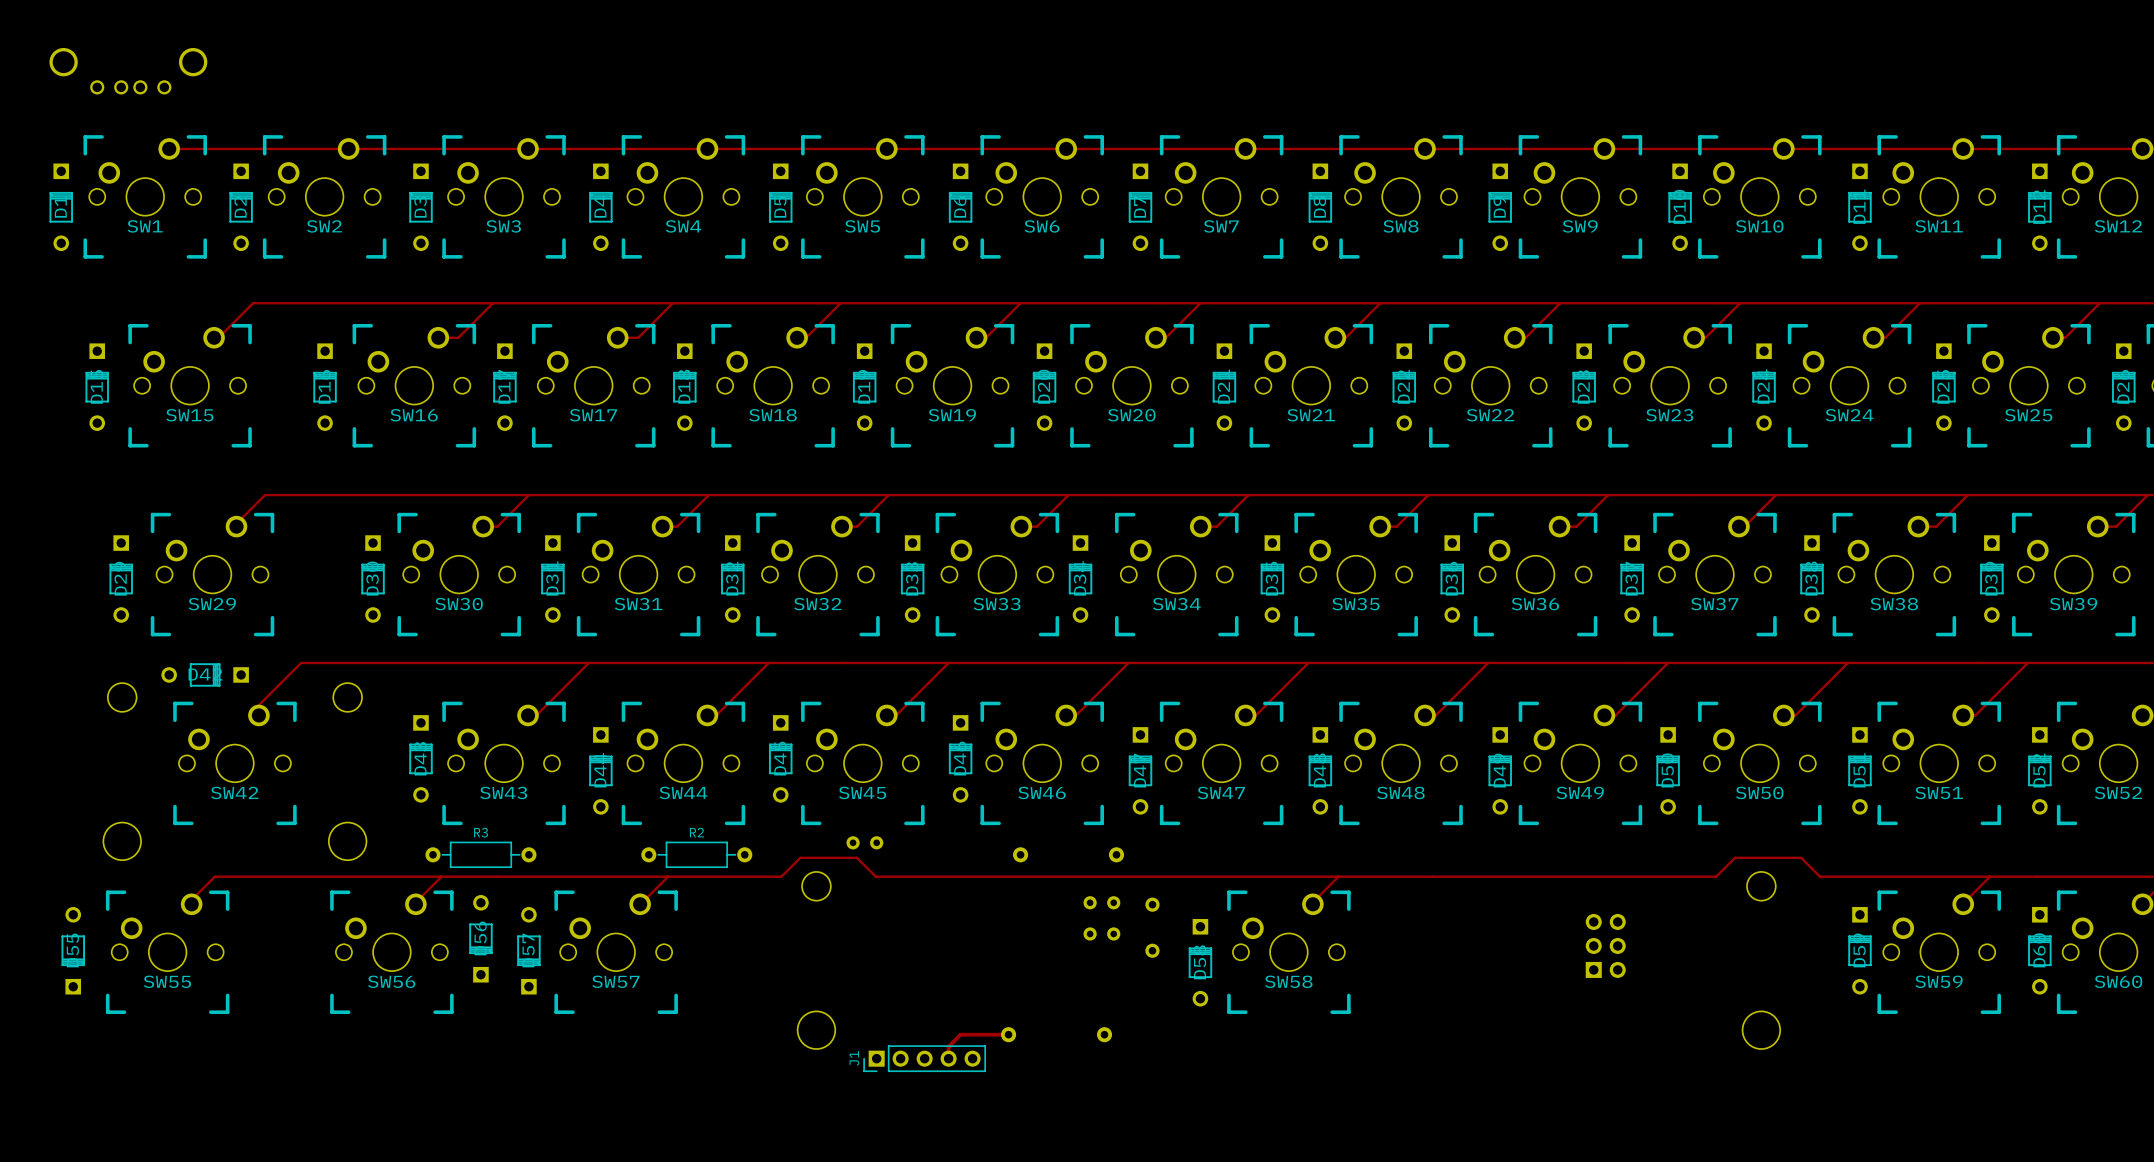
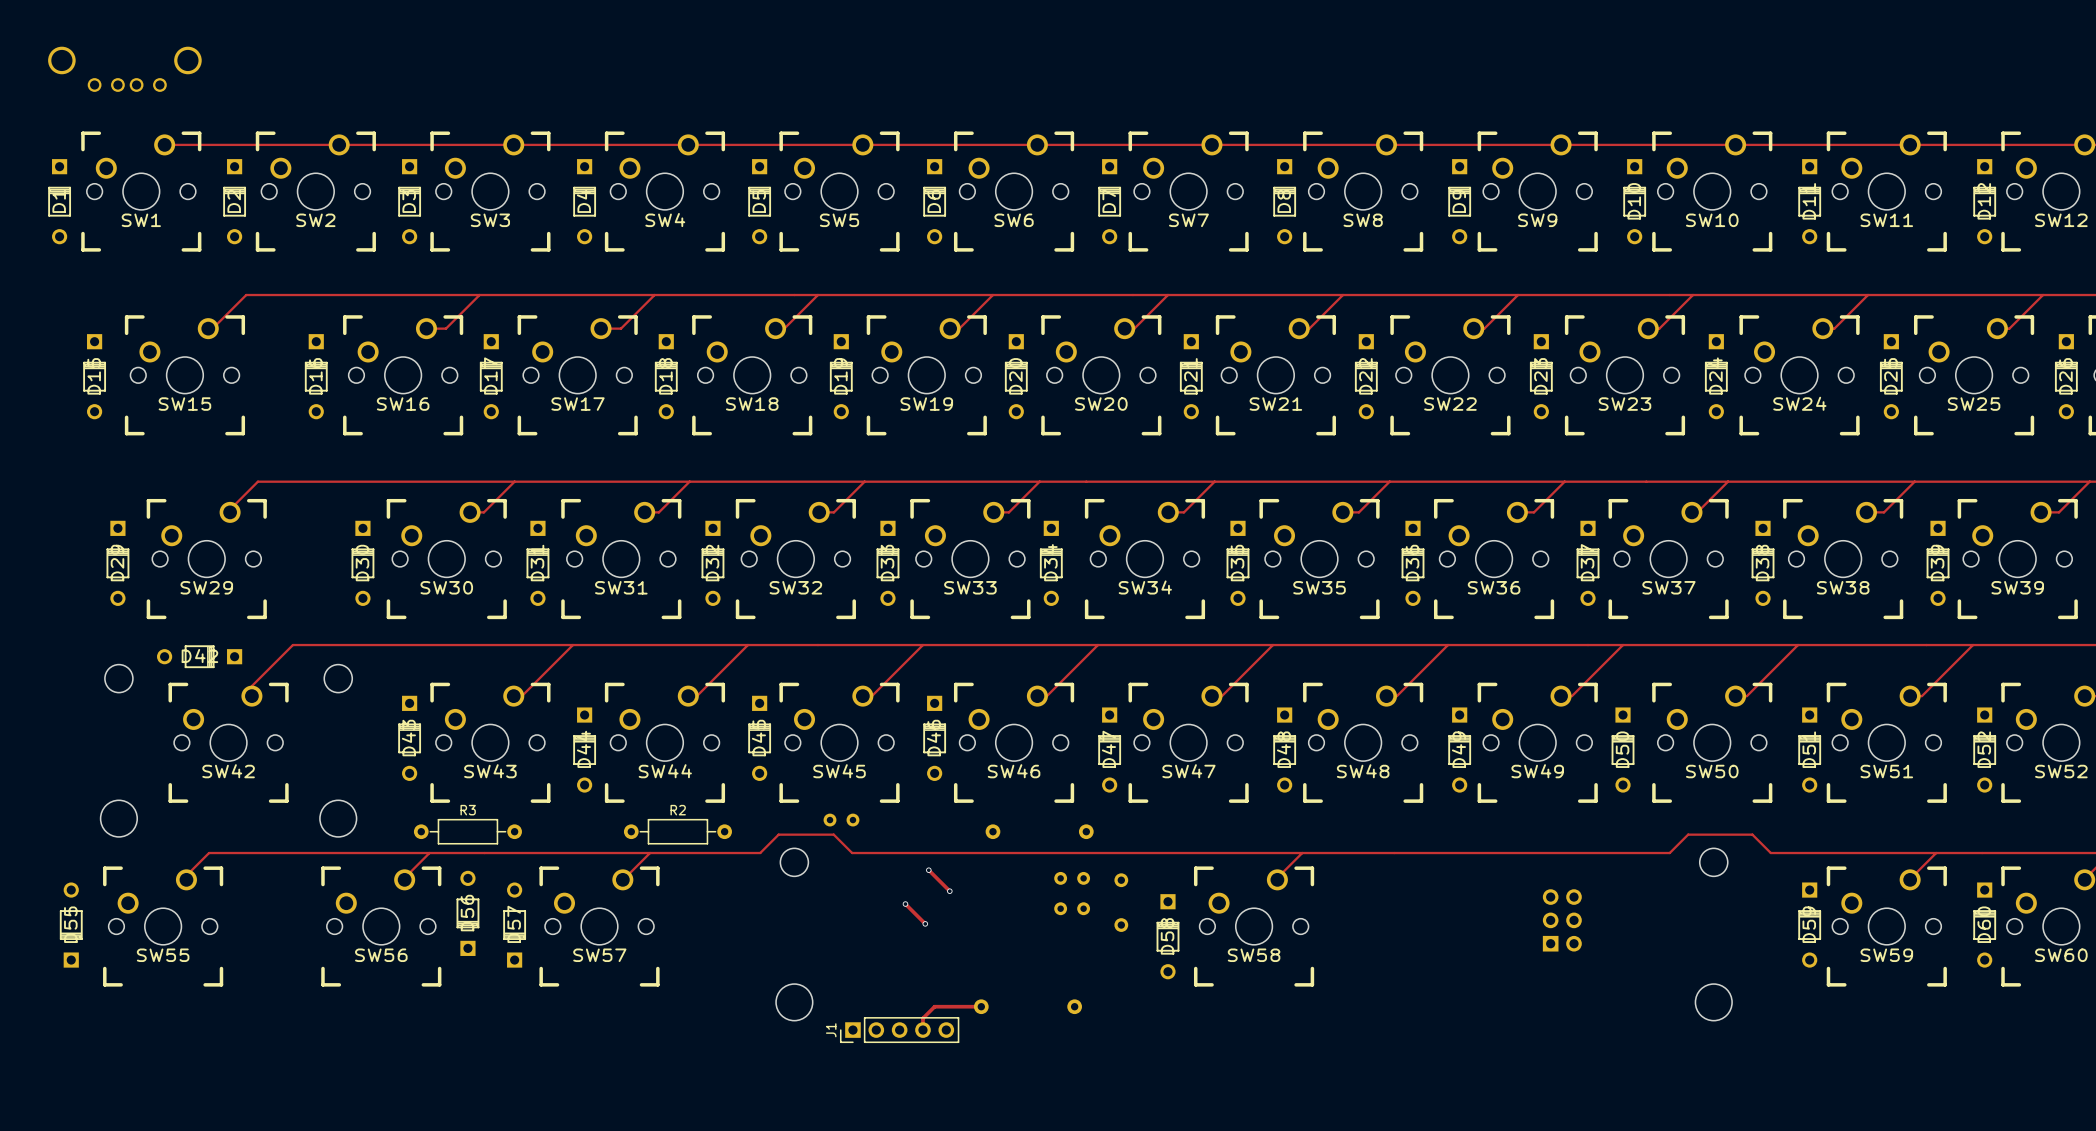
track: none -> (928, 870) (949, 891)
via: none -> (928, 870)
via: none -> (949, 891)
track: none -> (905, 904) (925, 923)
via: none -> (905, 904)
via: none -> (925, 923)

